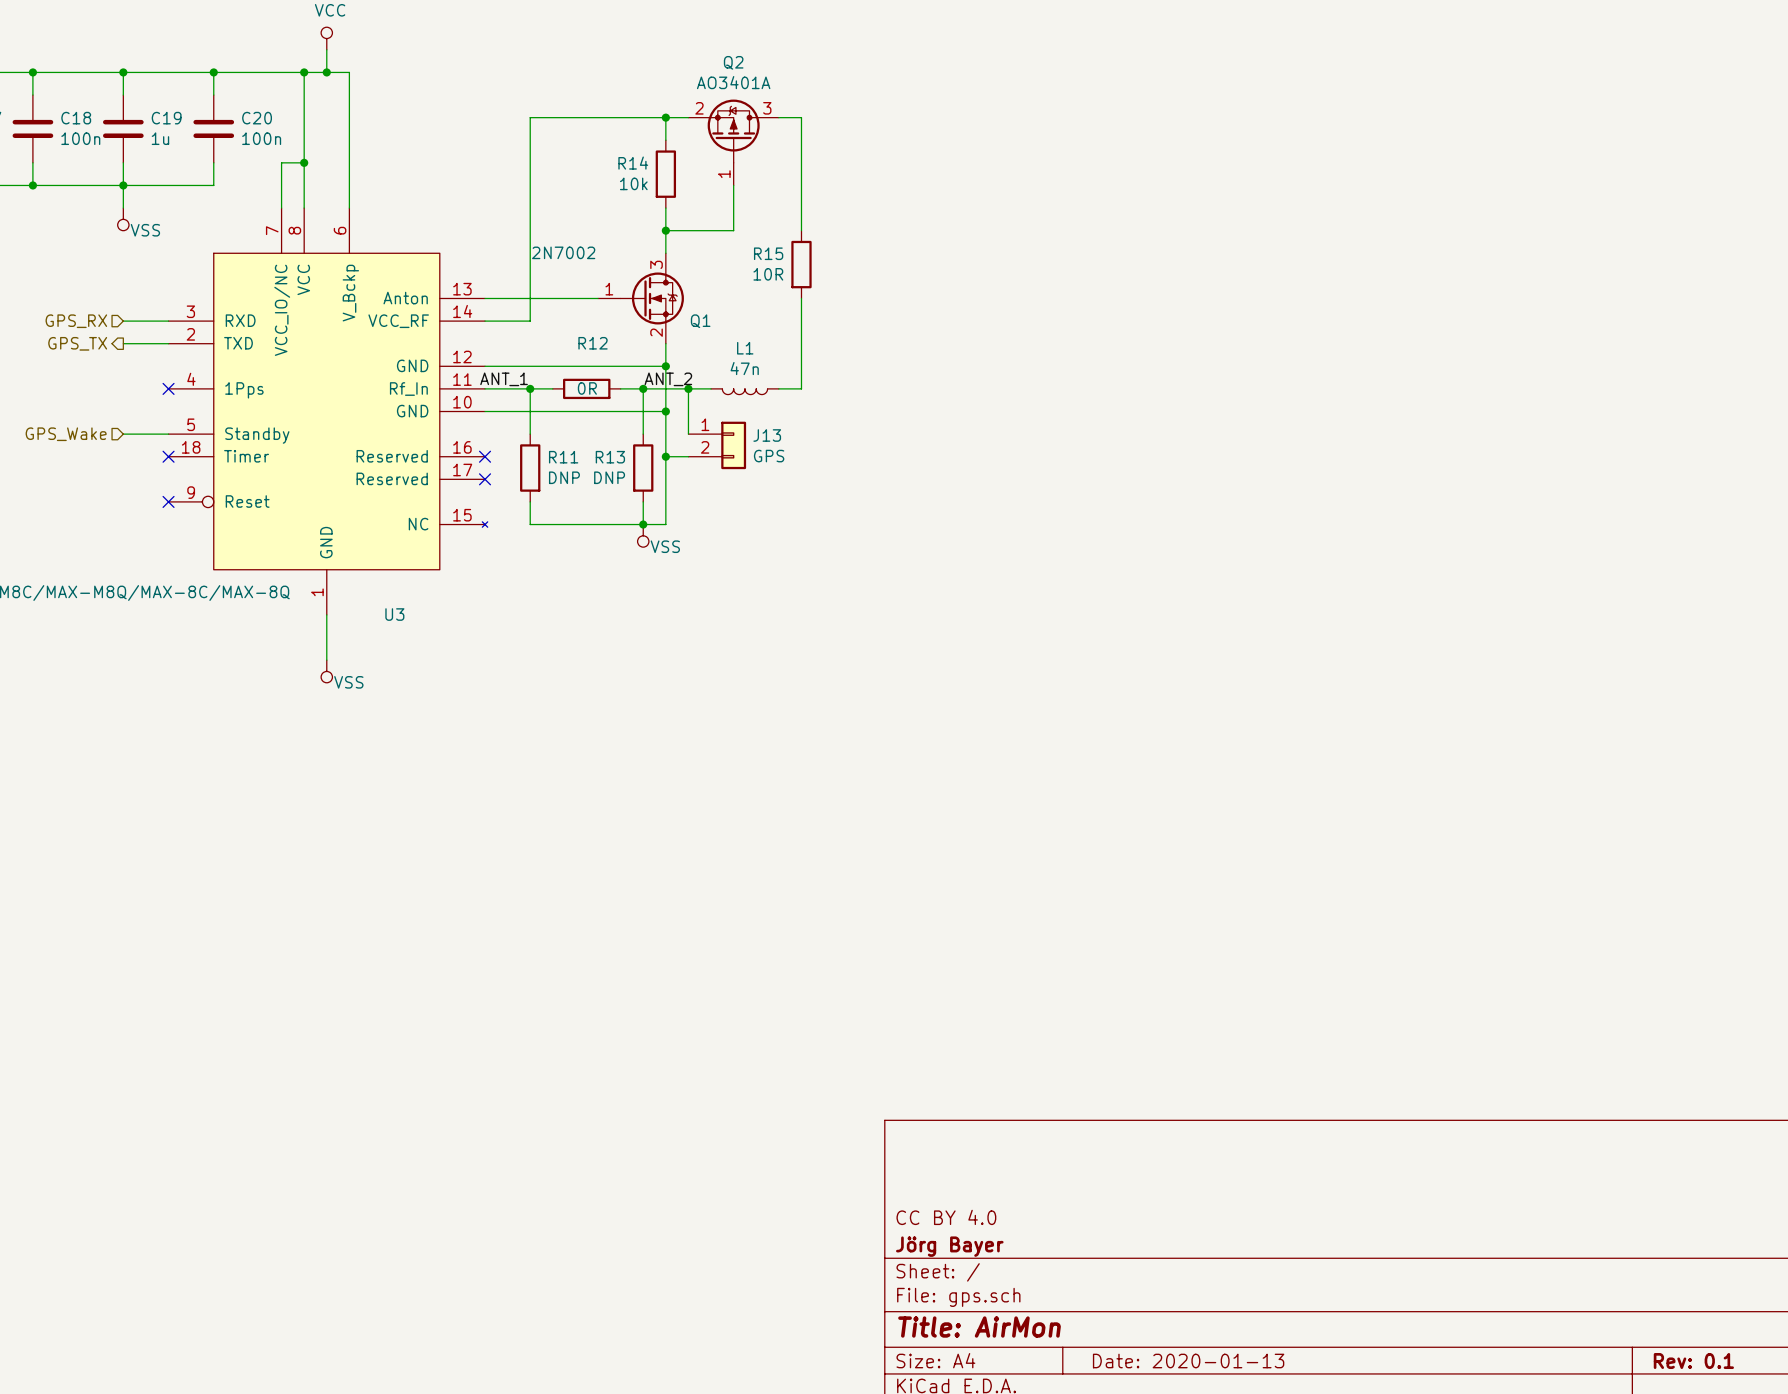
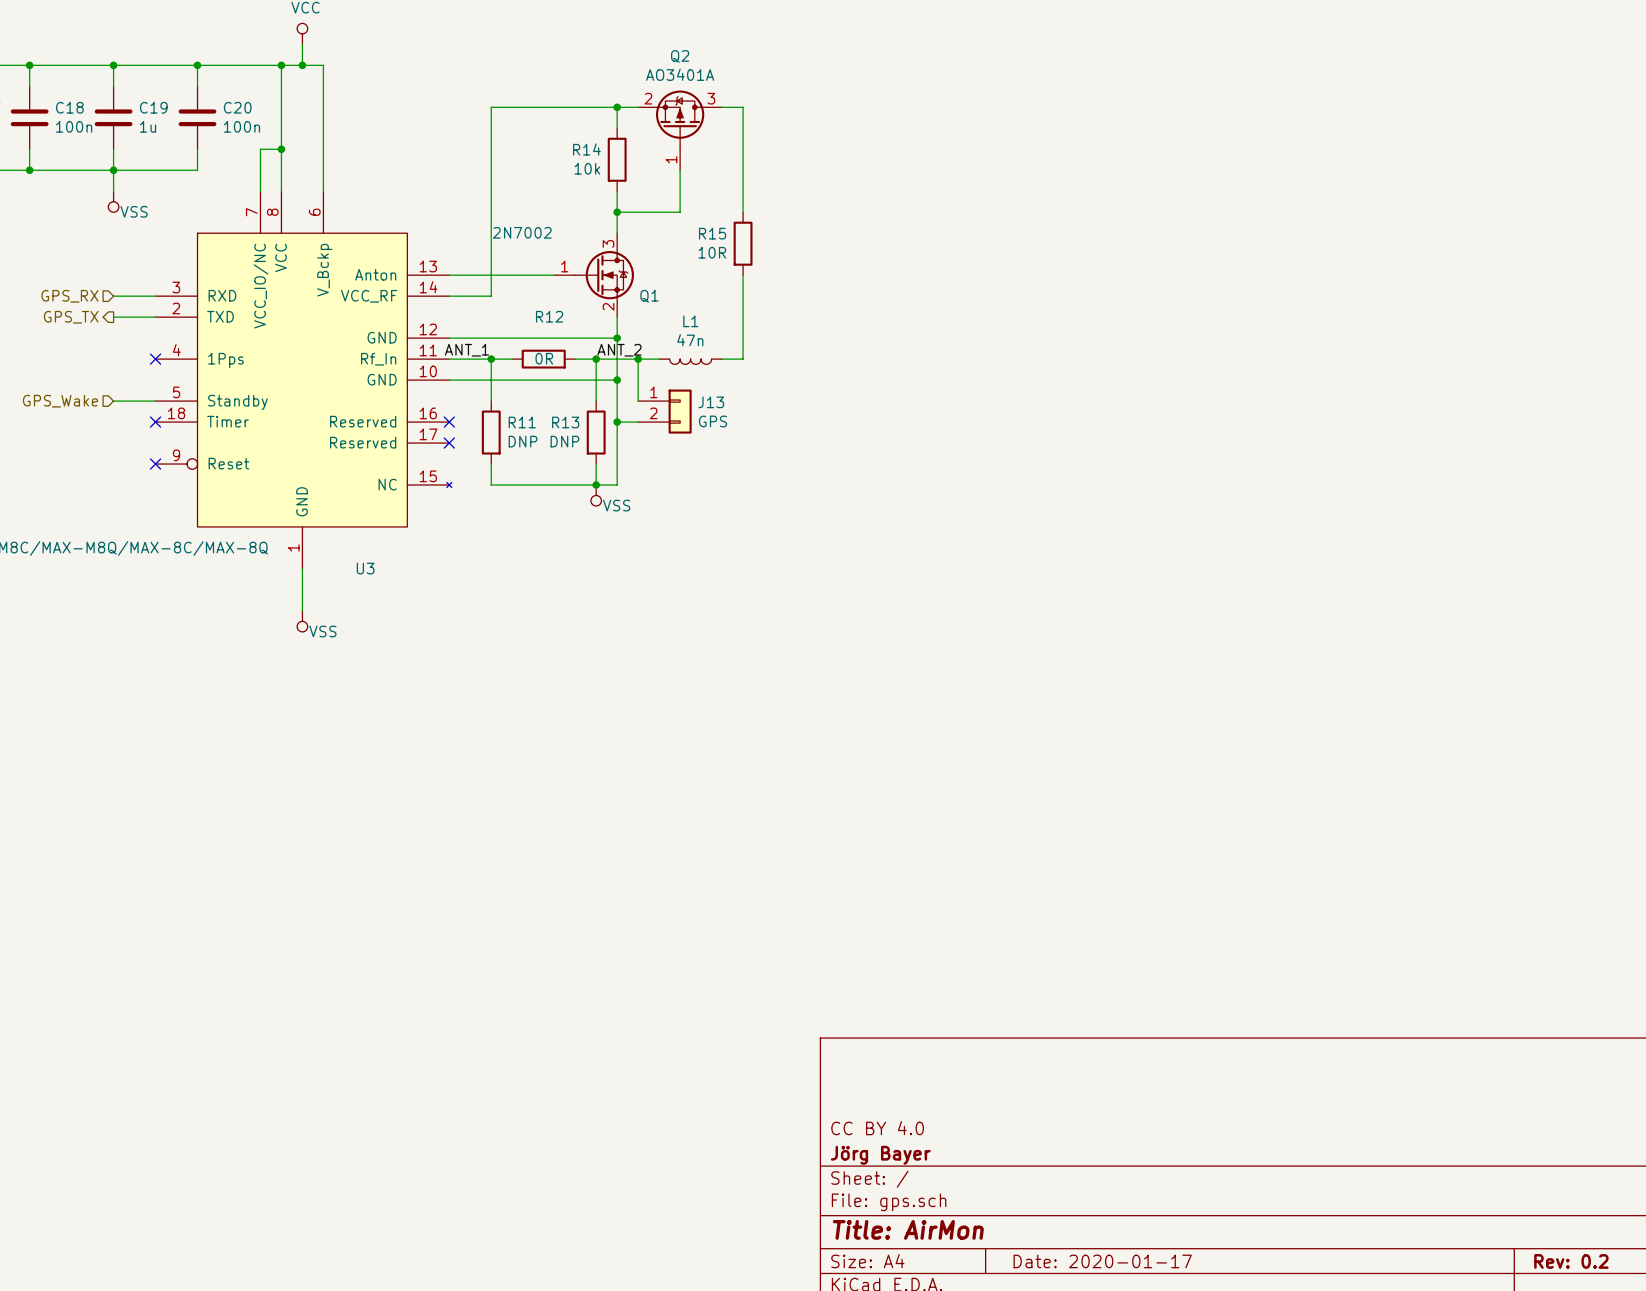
title block: Date: 2020-01-13 (1188, 1361) -> Date: 2020-01-17 (1102, 1261)
title block: Rev: 0.1 (1693, 1361) -> Rev: 0.2 (1571, 1261)

